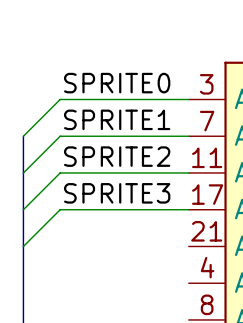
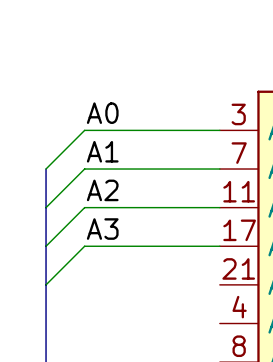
label: SPRITE0 (117, 83) -> A0 (102, 113)
label: SPRITE1 (117, 119) -> A1 (102, 151)
label: SPRITE2 (117, 156) -> A2 (102, 190)
label: SPRITE3 (117, 193) -> A3 (102, 229)

